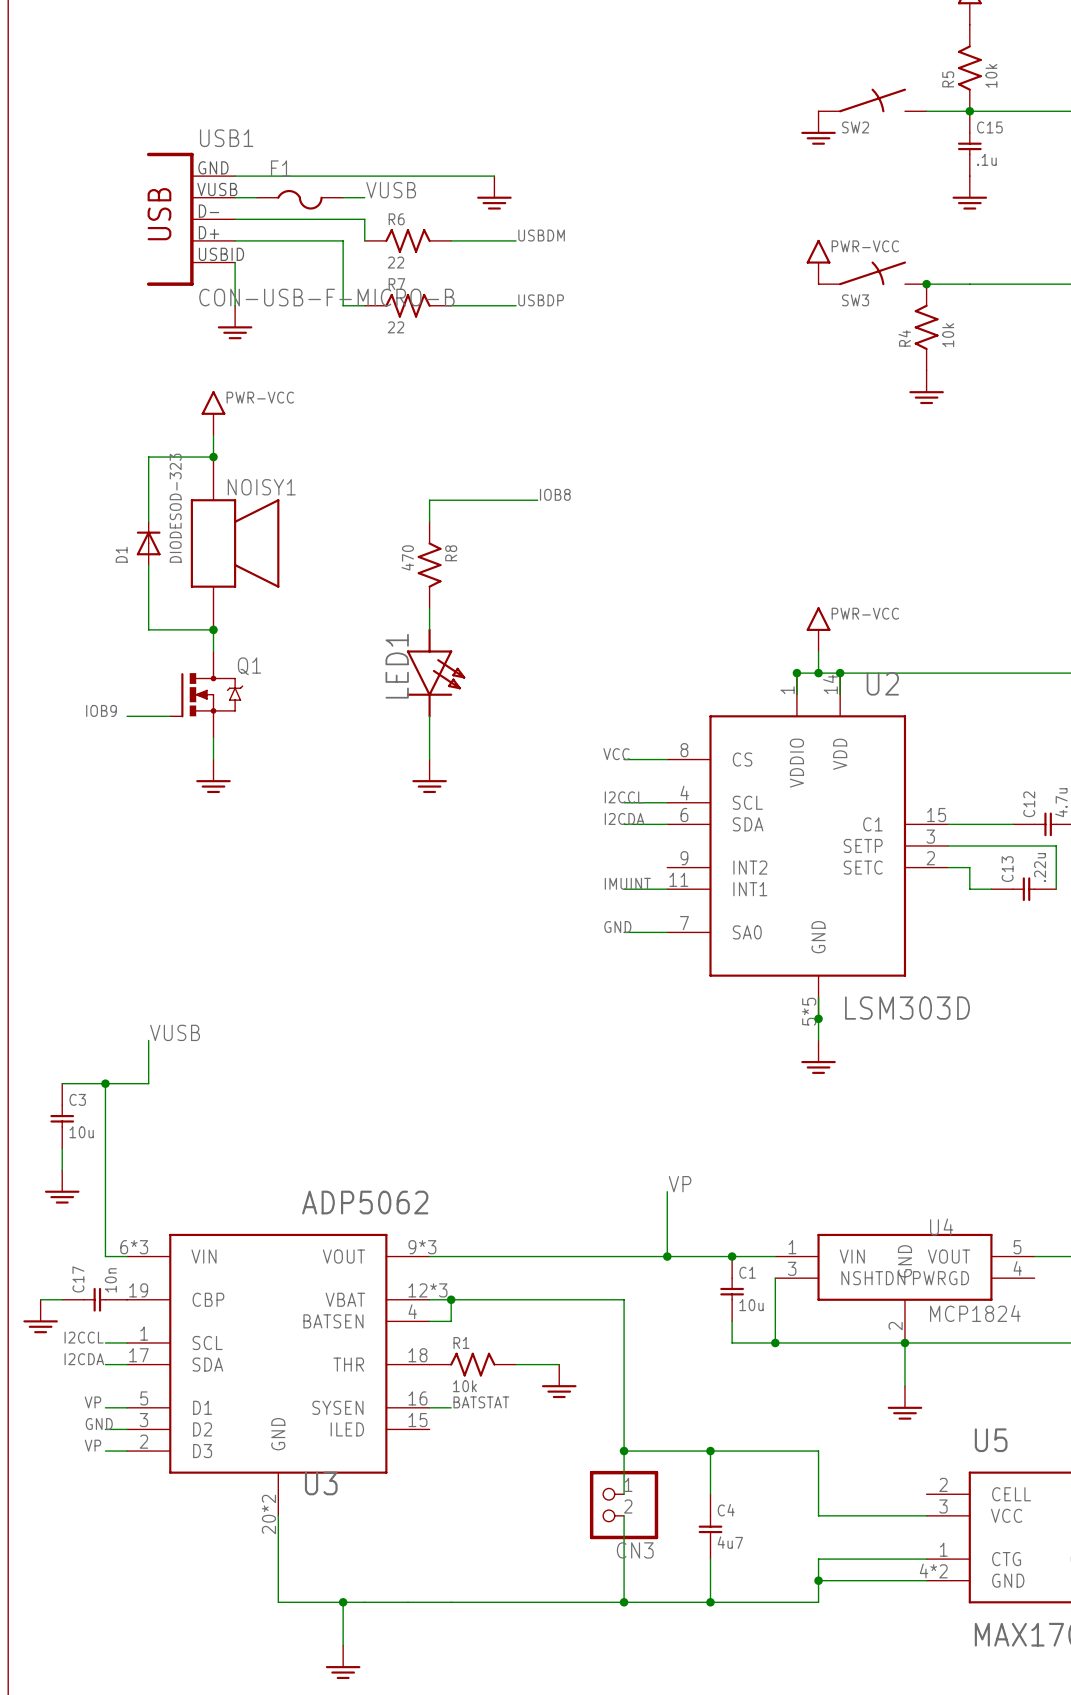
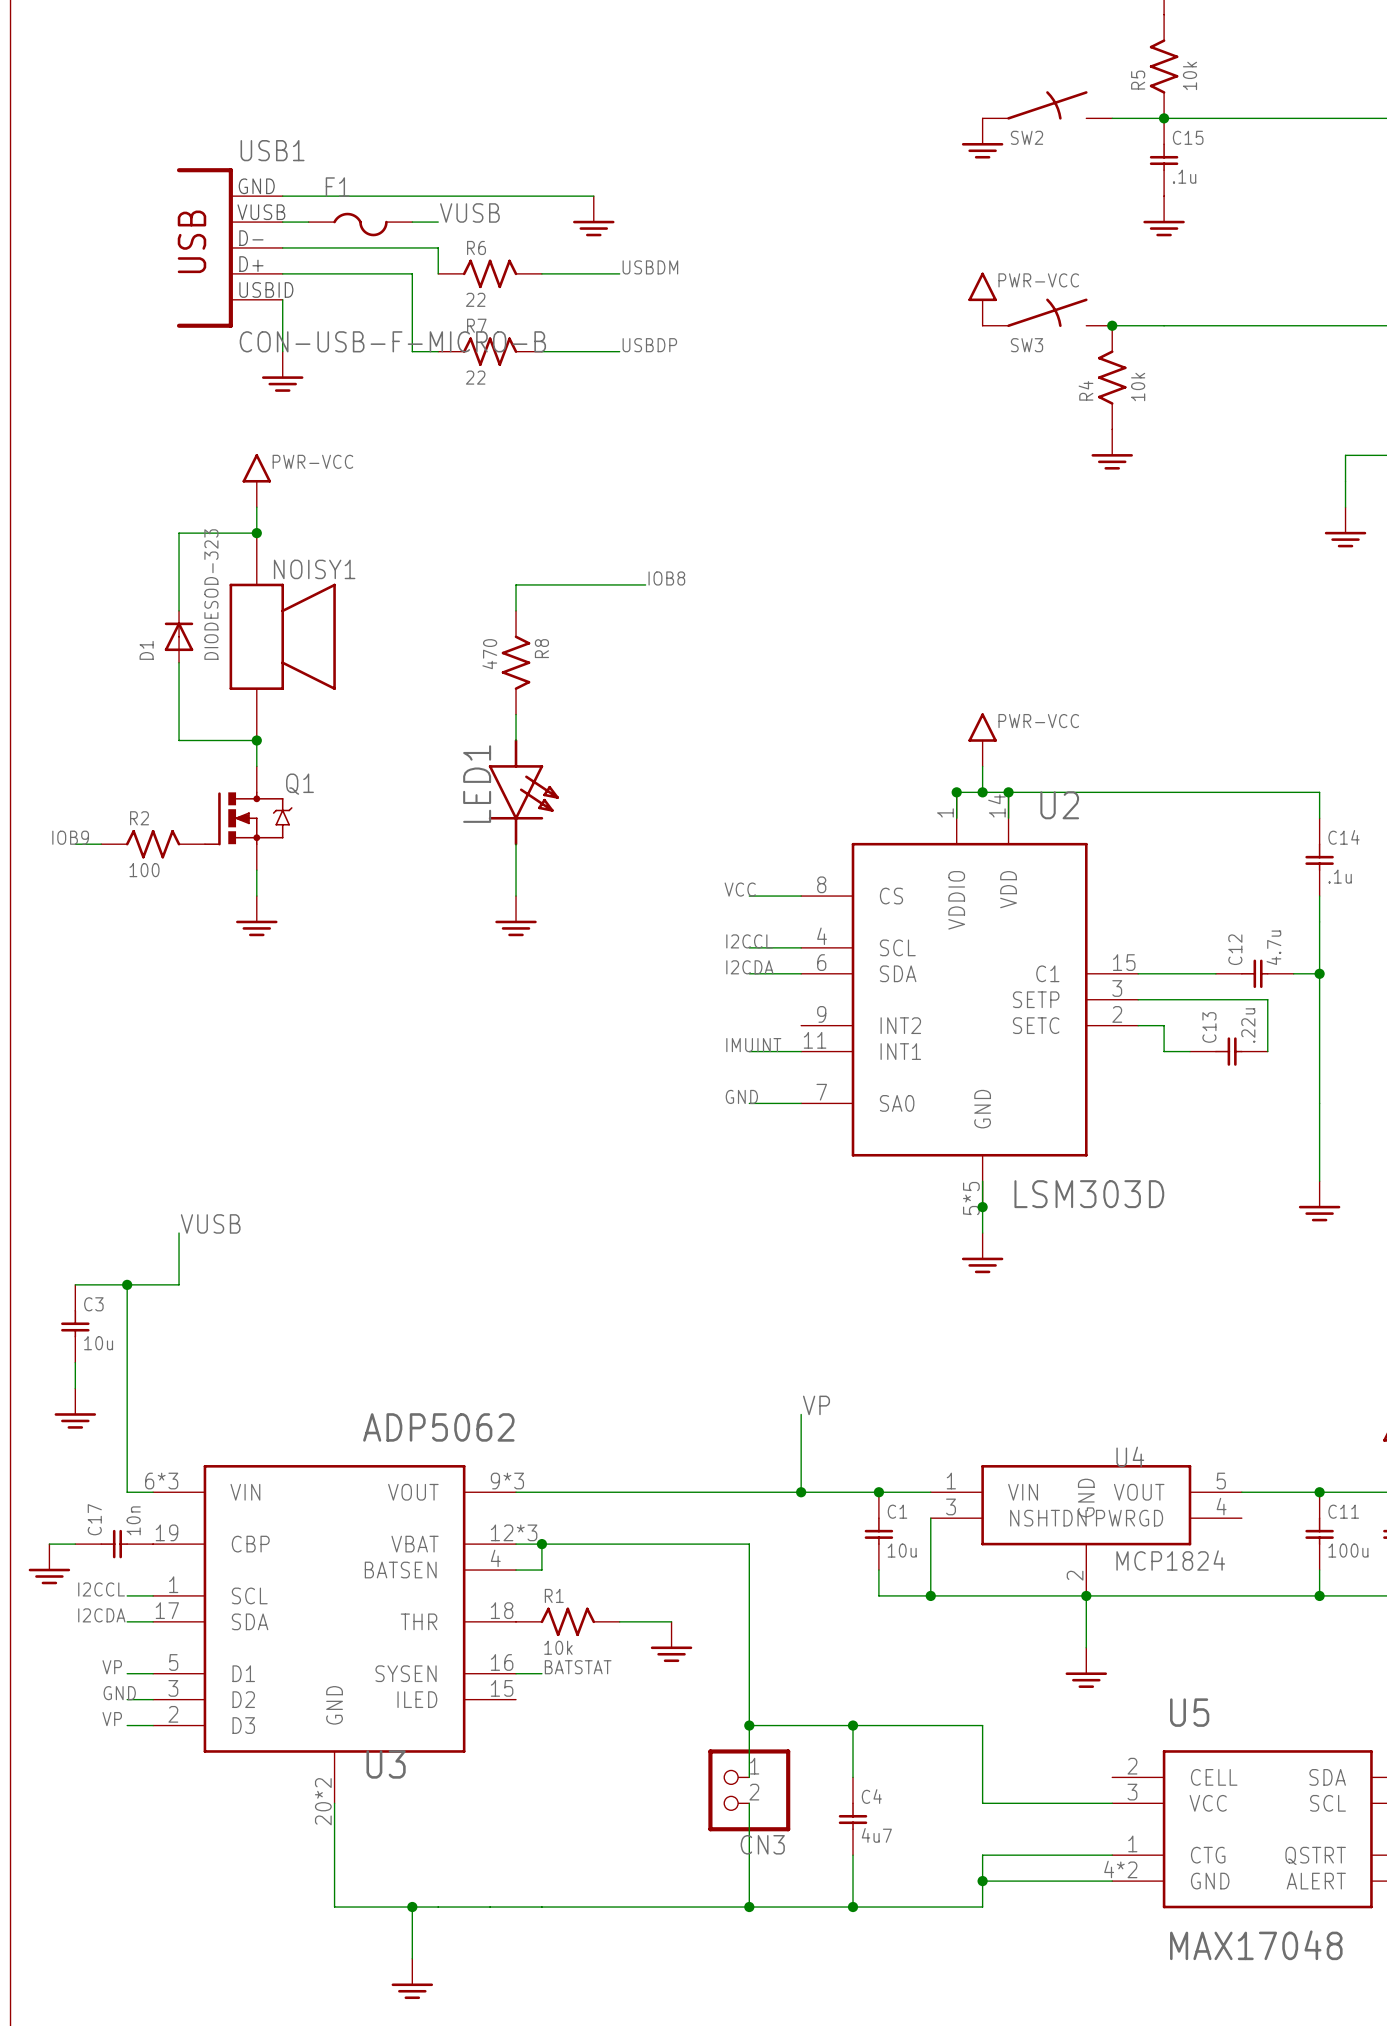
label position: IOB9 (101, 710) -> IOB9 (70, 837)
wire: none -> (75, 844) (101, 844)
R2: none -> 100 (153, 844)

